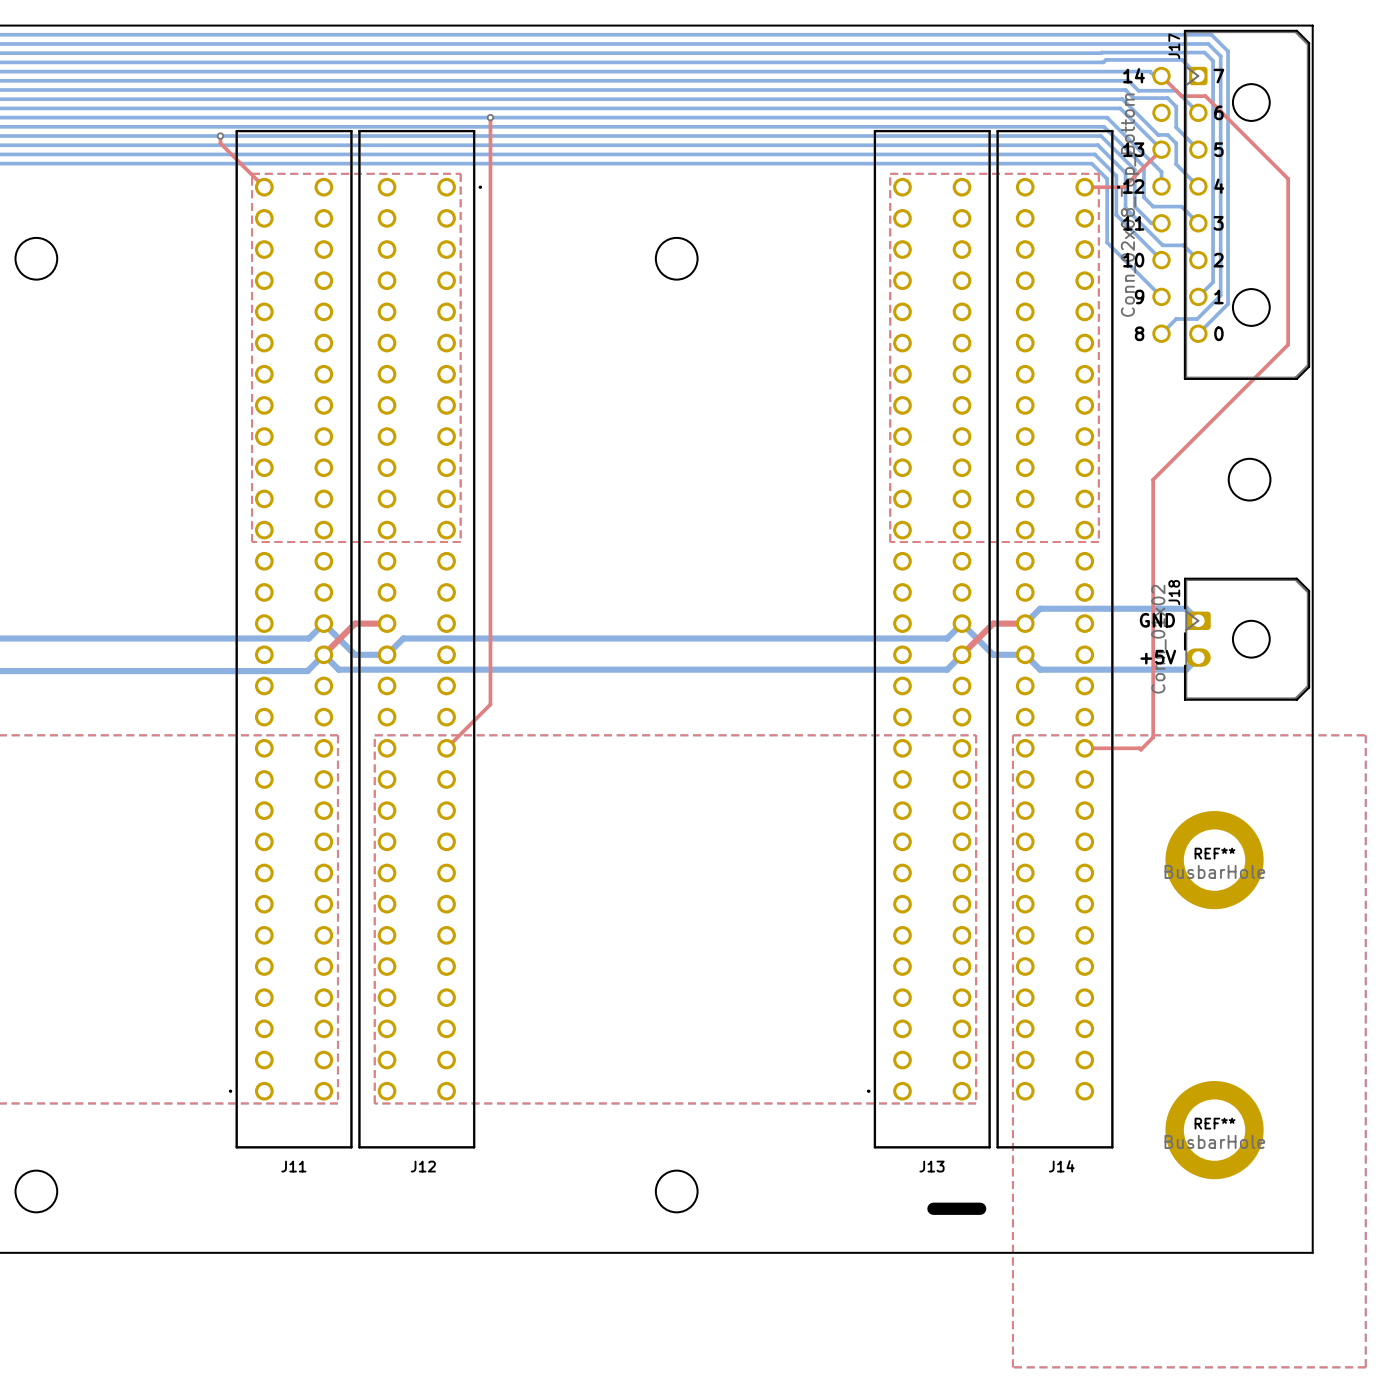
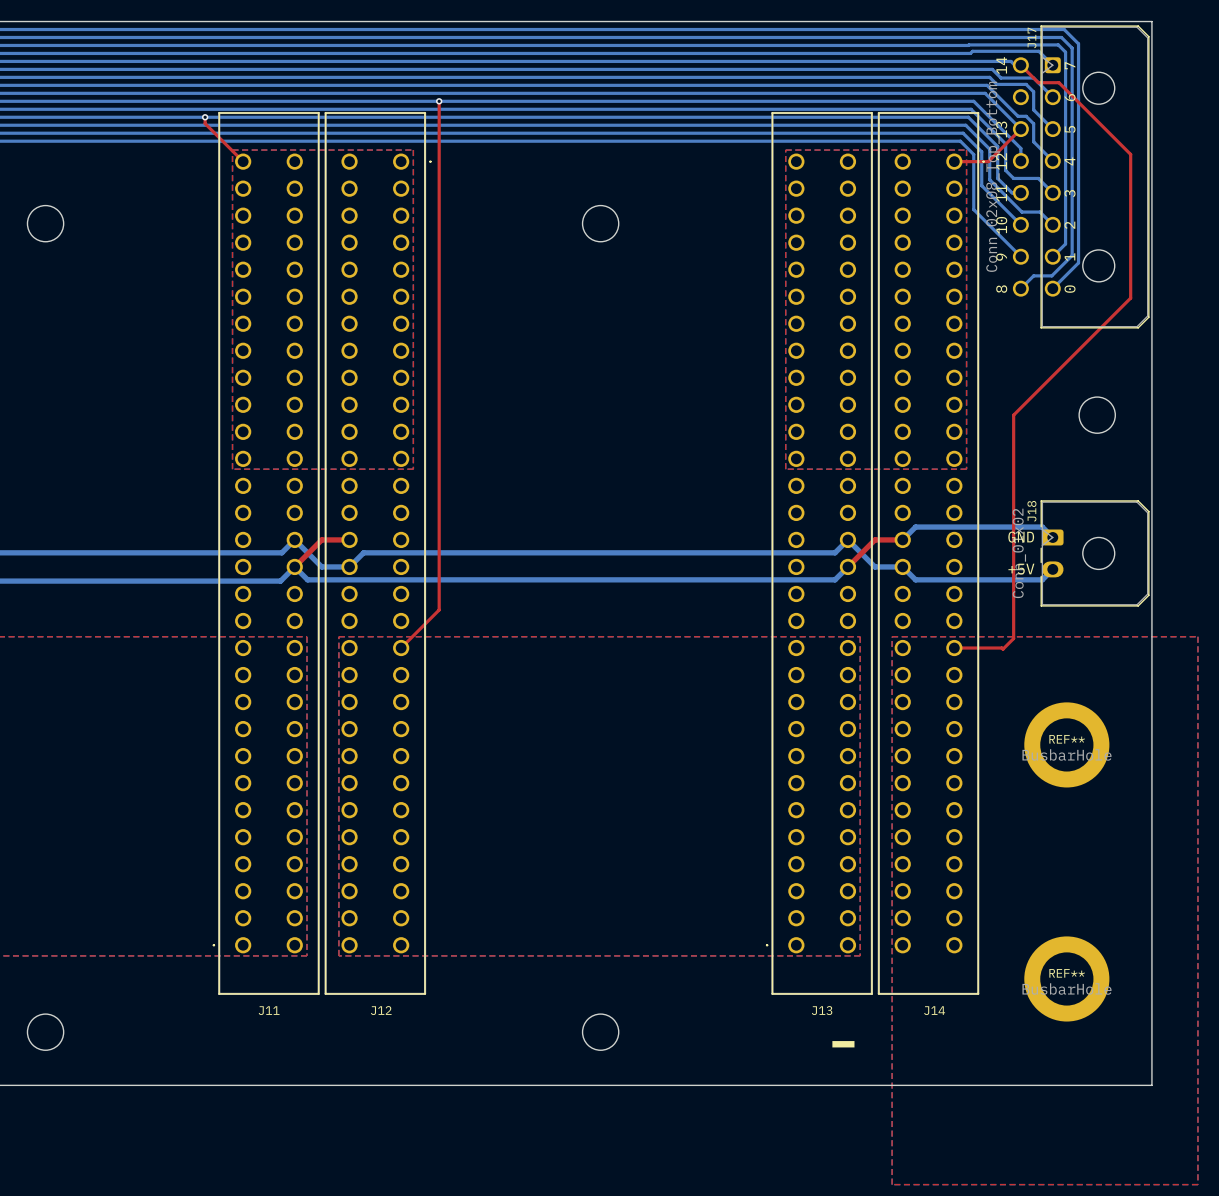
text rotation: 0° (1134, 75) -> 90° counterclockwise (1001, 65)
text rotation: 0° (1218, 76) -> 90° counterclockwise (1070, 65)
text rotation: 0° (1218, 112) -> 90° counterclockwise (1070, 97)
text rotation: 0° (1133, 149) -> 90° counterclockwise (1001, 129)
text rotation: 0° (1218, 149) -> 90° counterclockwise (1070, 129)
text rotation: 0° (1133, 186) -> 90° counterclockwise (1001, 161)
text rotation: 0° (1219, 186) -> 90° counterclockwise (1070, 161)
text rotation: 0° (1133, 223) -> 90° counterclockwise (1001, 193)
text rotation: 0° (1218, 223) -> 90° counterclockwise (1070, 193)
text rotation: 0° (1133, 260) -> 90° counterclockwise (1001, 225)
text rotation: 0° (1218, 260) -> 90° counterclockwise (1069, 225)
text rotation: 0° (1139, 296) -> 90° counterclockwise (1001, 257)
text rotation: 0° (1218, 296) -> 90° counterclockwise (1070, 257)
text rotation: 0° (1139, 333) -> 90° counterclockwise (1001, 289)
text rotation: 0° (1218, 333) -> 90° counterclockwise (1070, 289)

